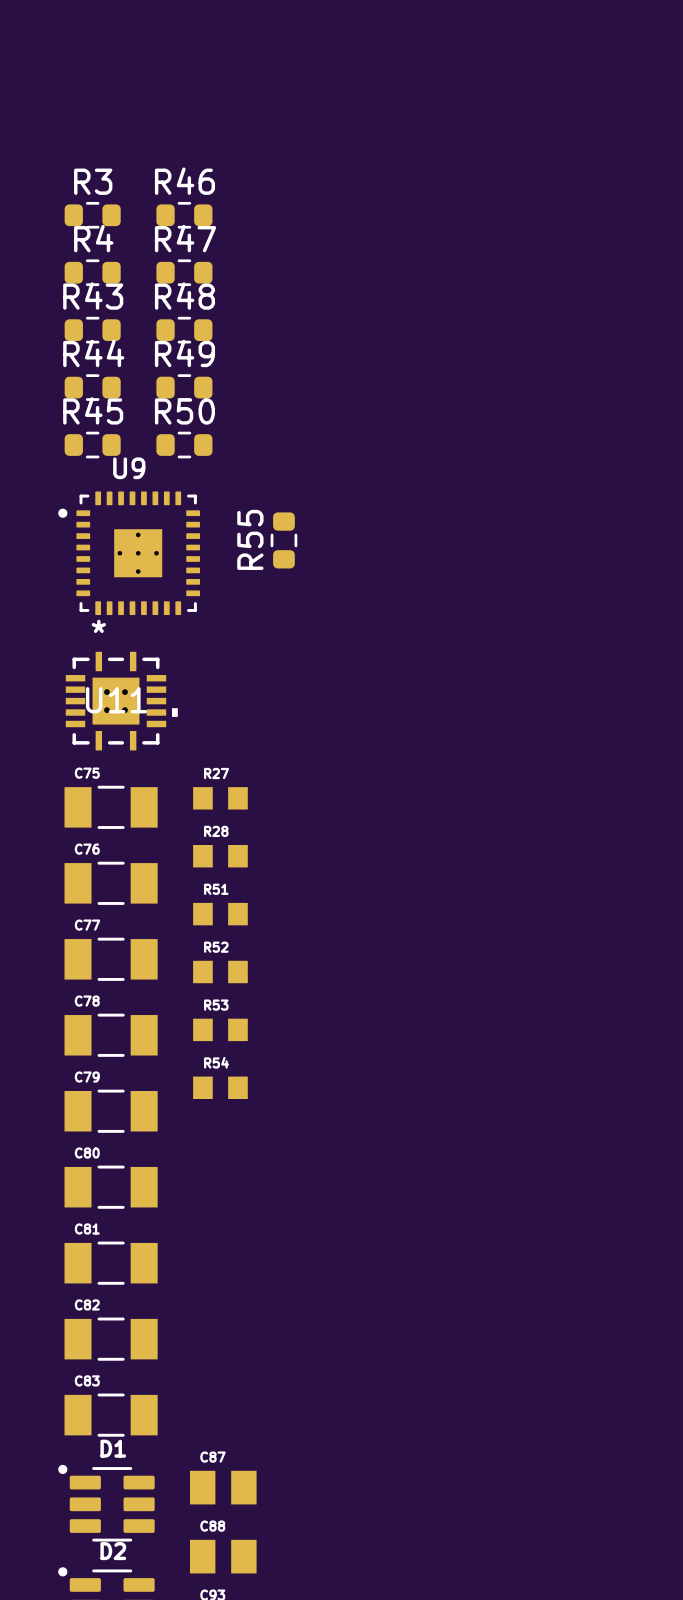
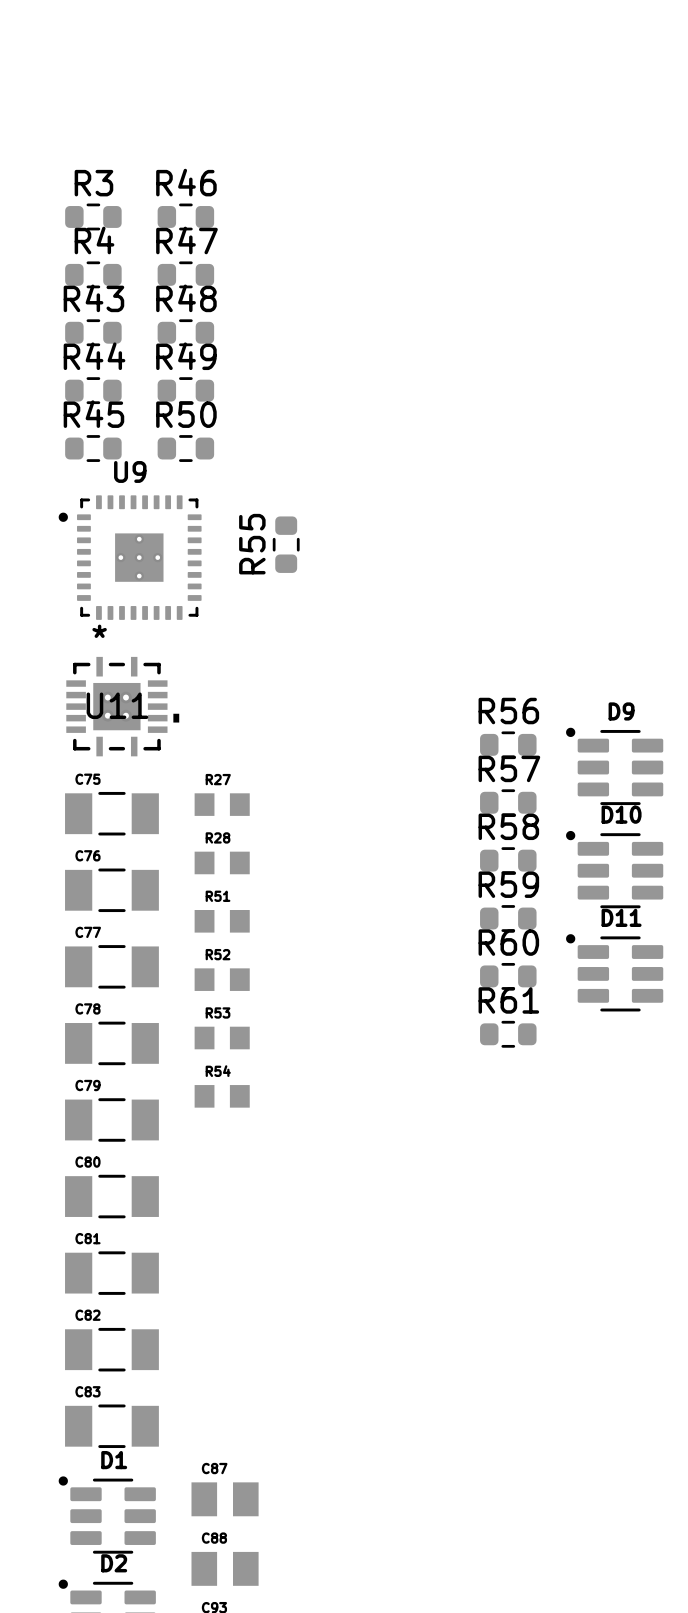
R56: none -> (508, 744)
D9: none -> (614, 766)
R57: none -> (508, 802)
R58: none -> (508, 860)
D10: none -> (614, 869)
R59: none -> (508, 918)
D11: none -> (614, 972)
R60: none -> (508, 976)
R61: none -> (508, 1034)

